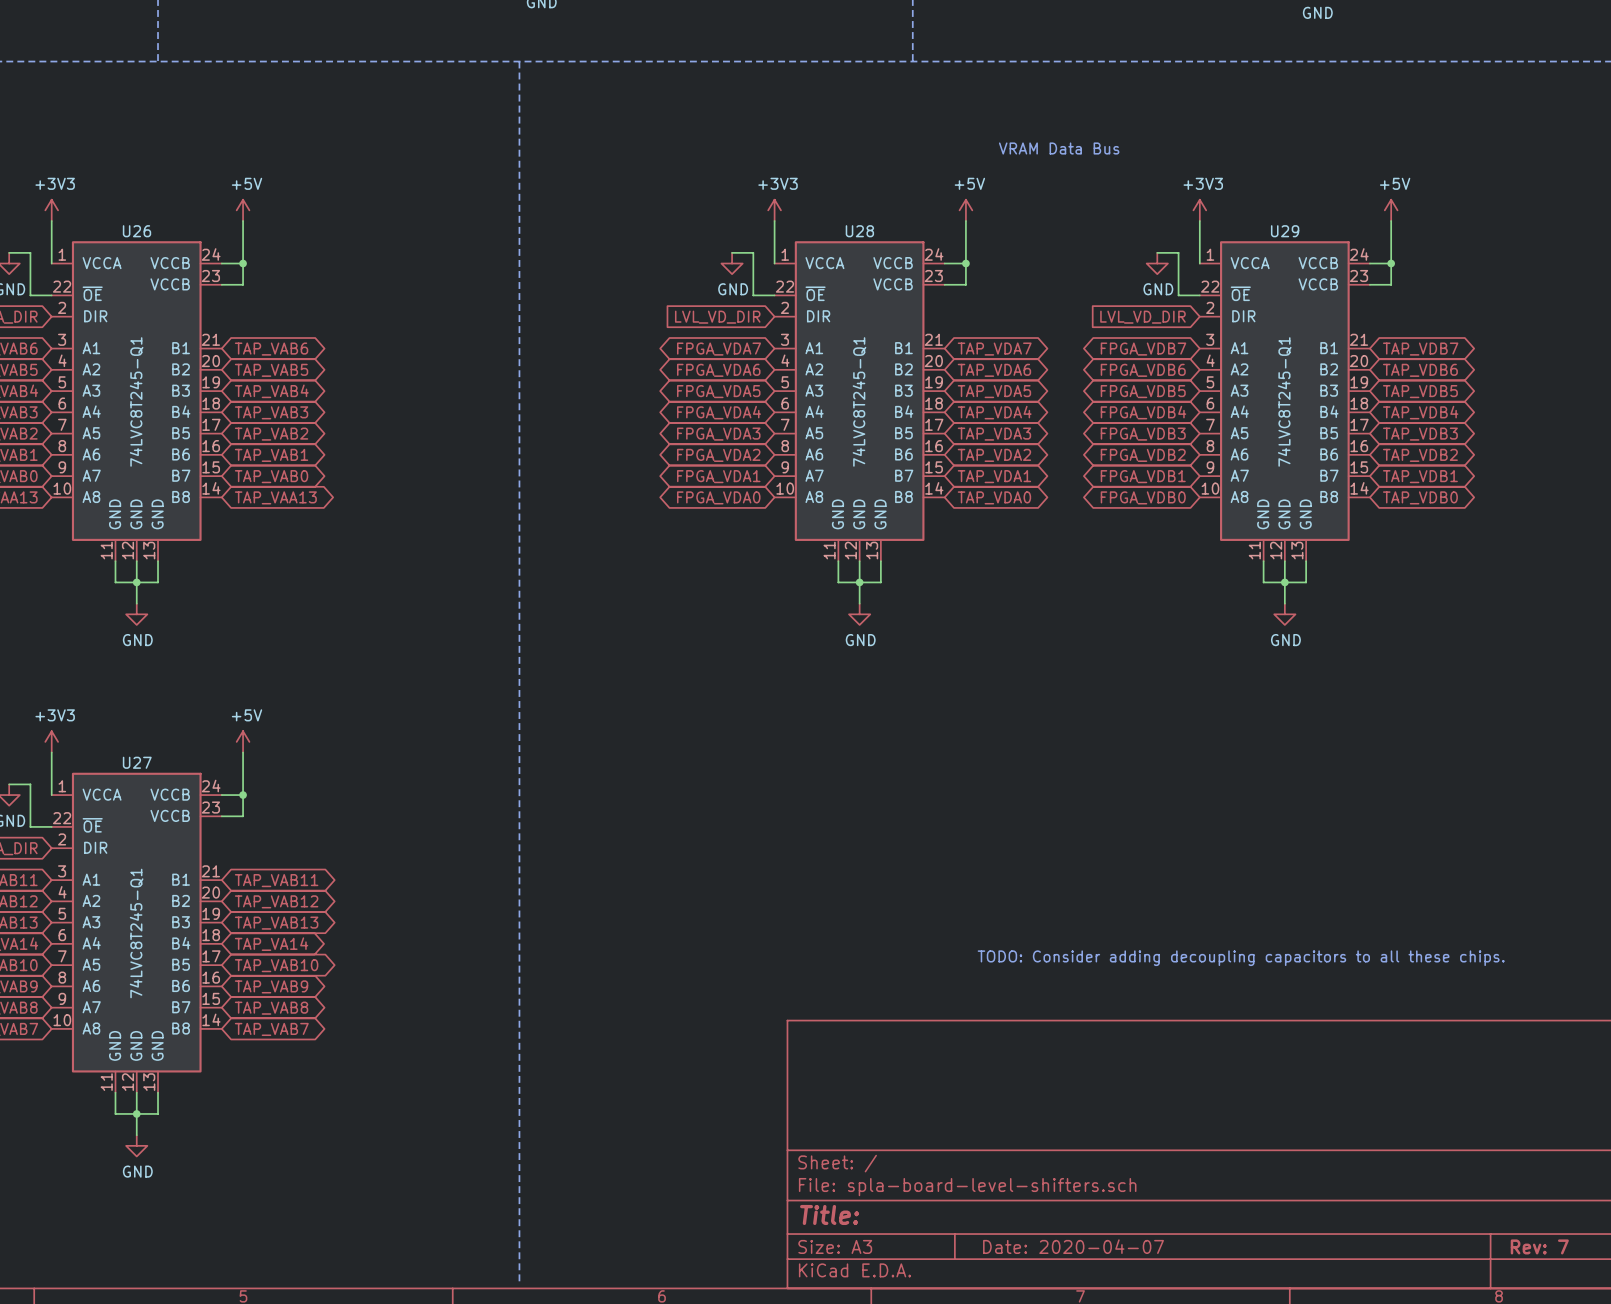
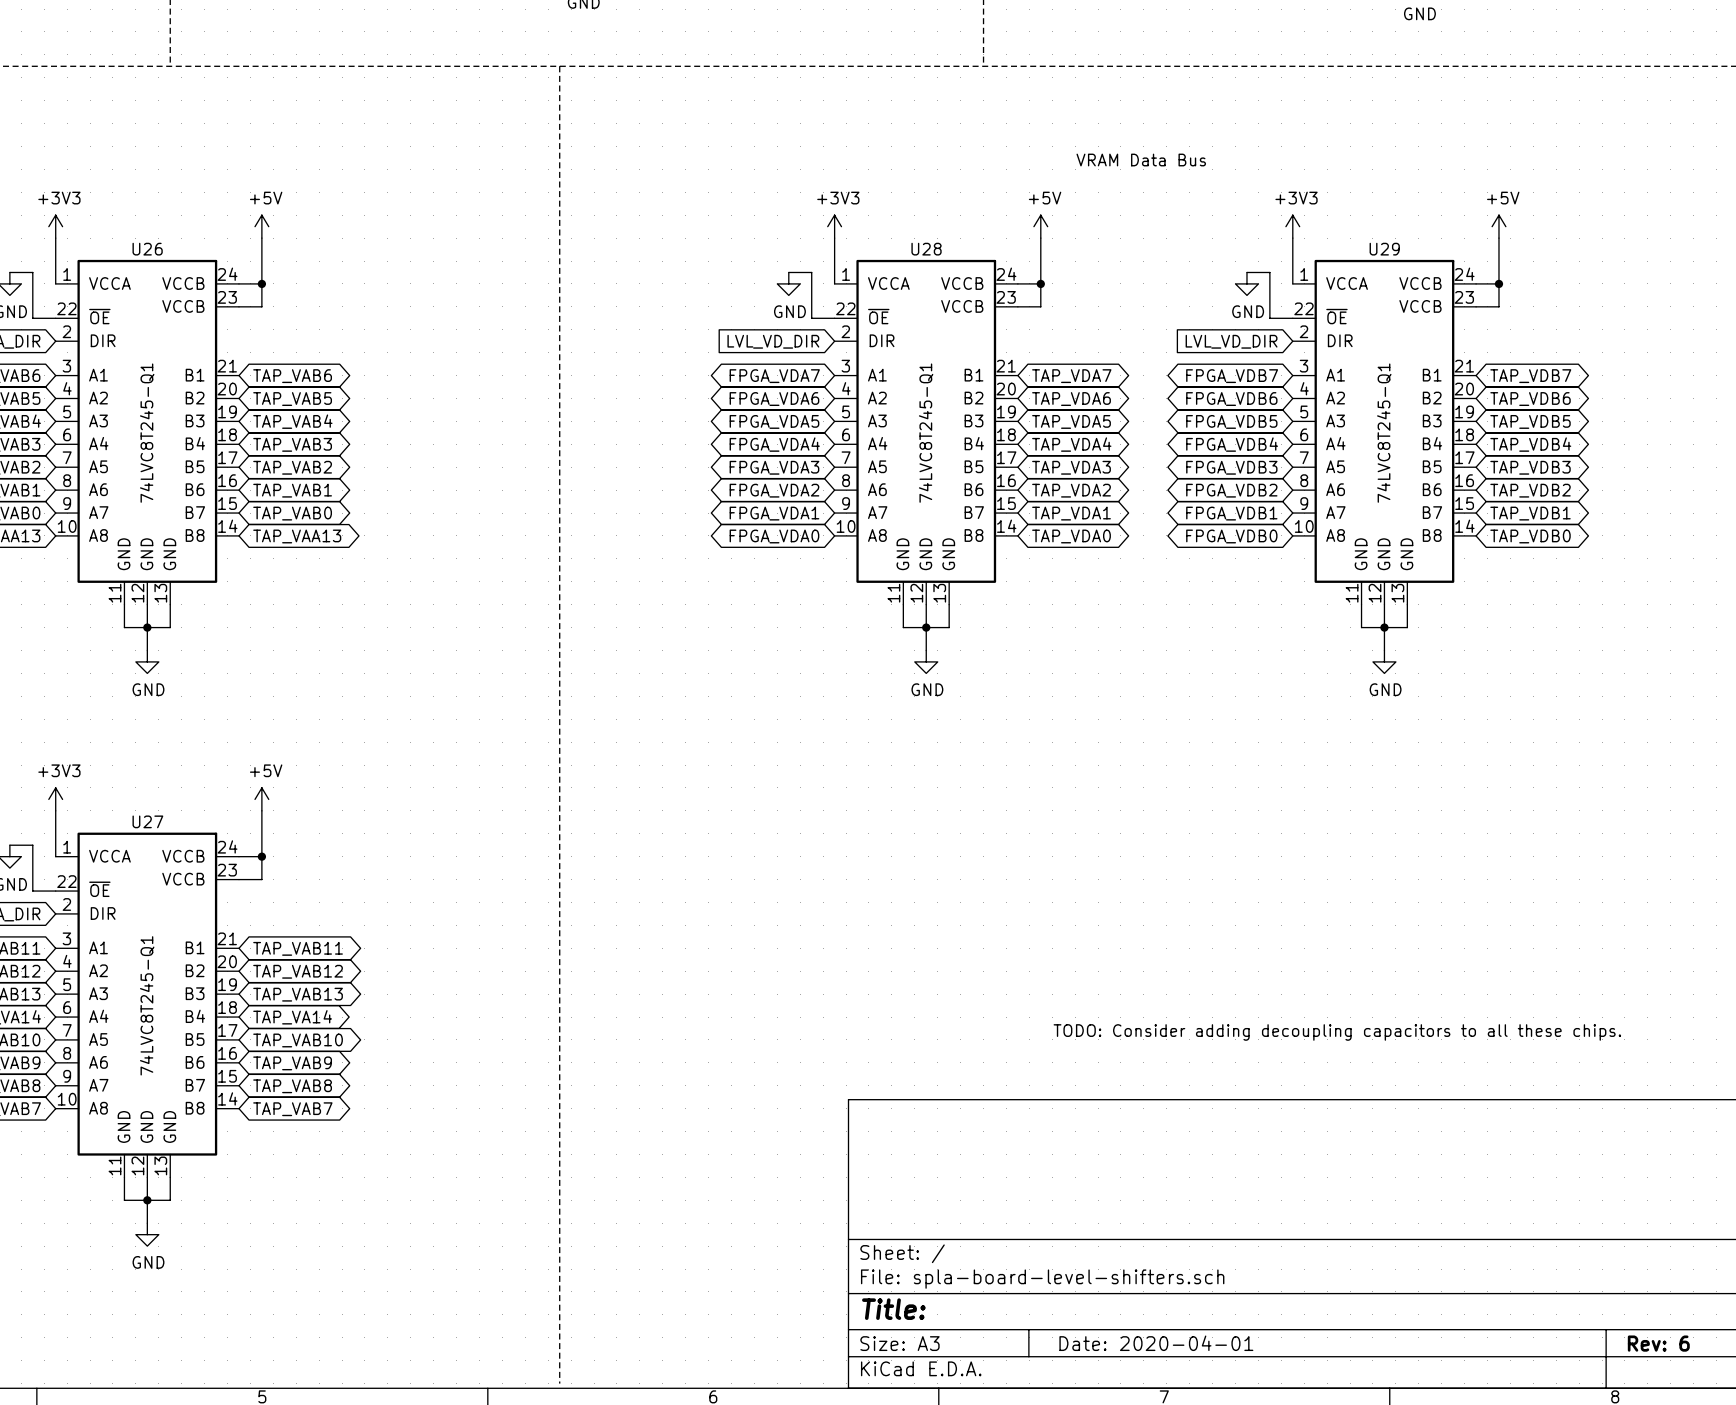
title block: Date: 2020-04-07 (1073, 1246) -> Date: 2020-04-01 (1156, 1343)
title block: Rev: 7 (1539, 1246) -> Rev: 6 (1658, 1343)

